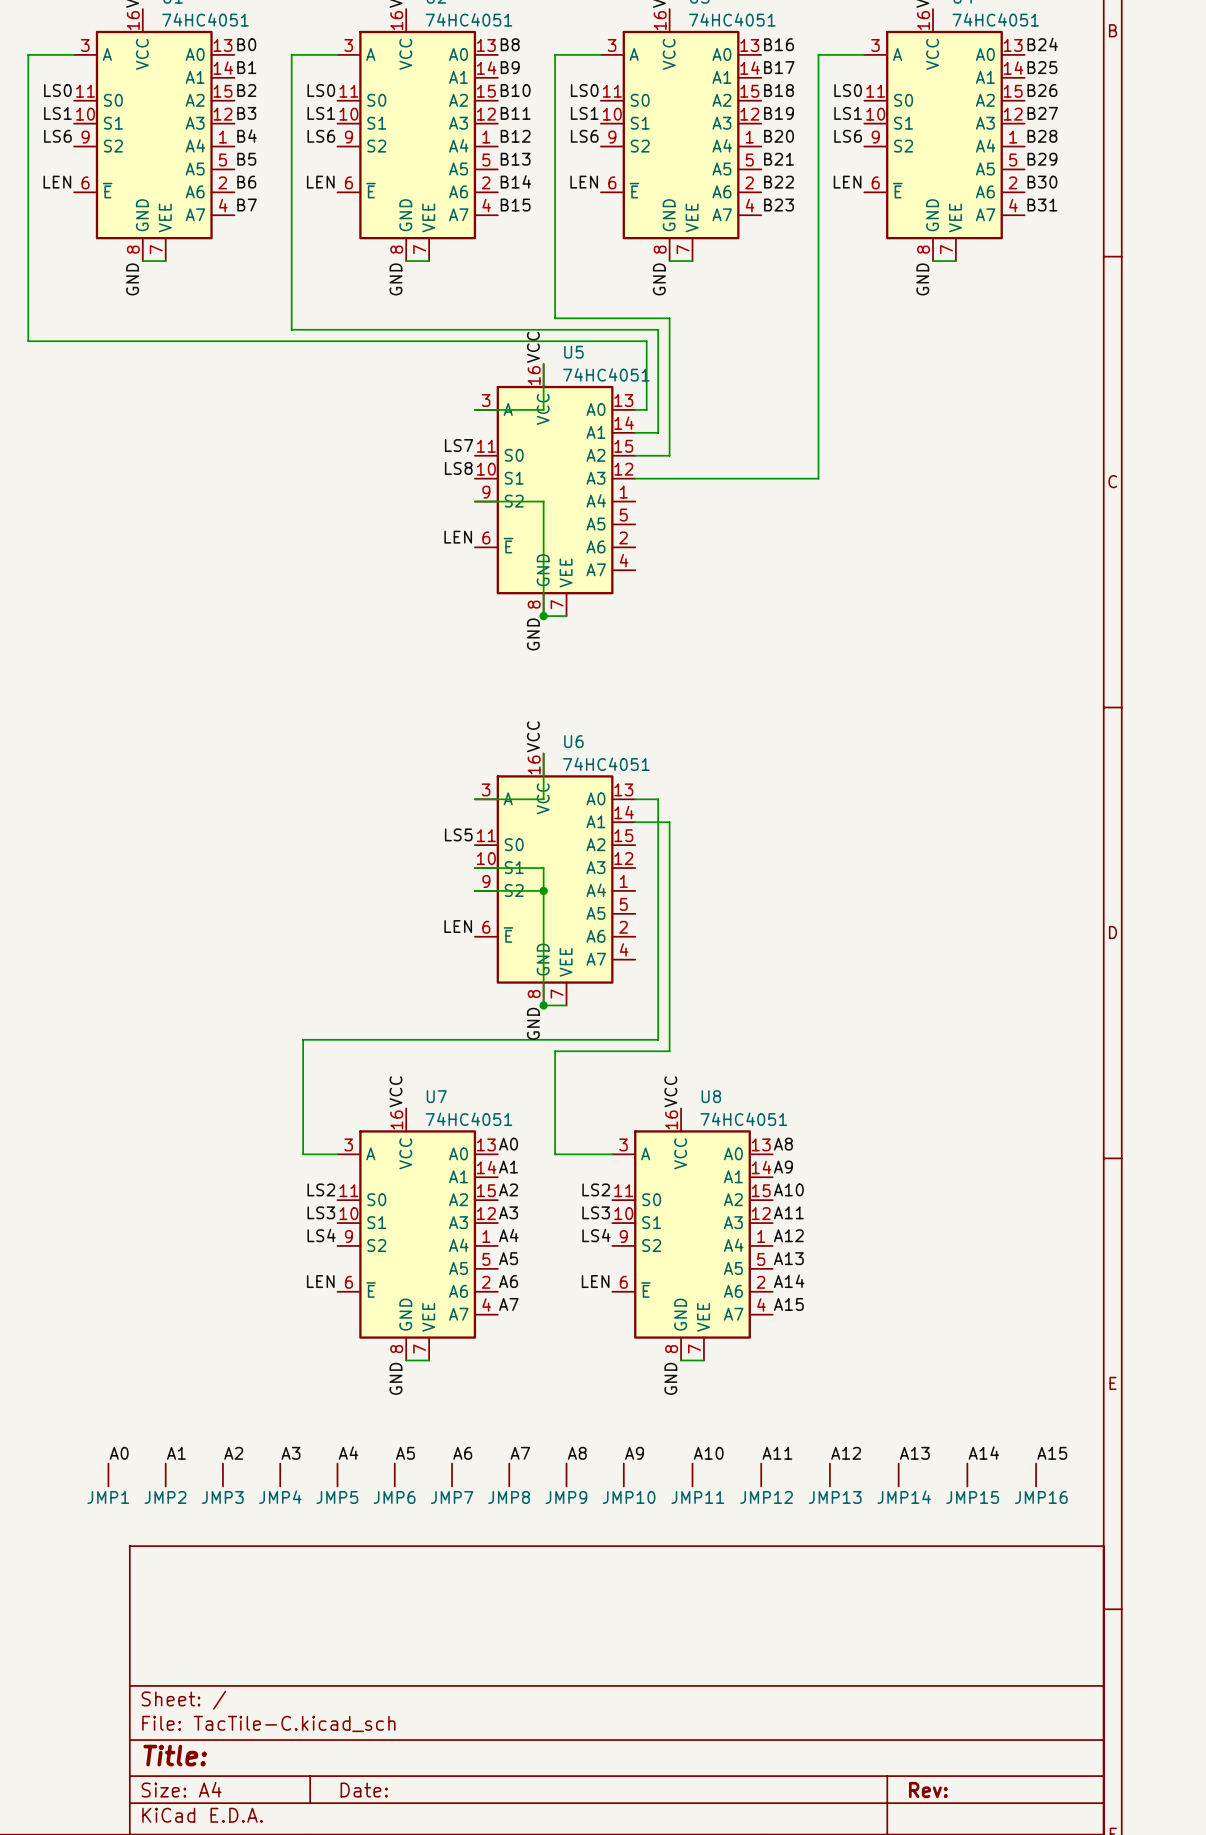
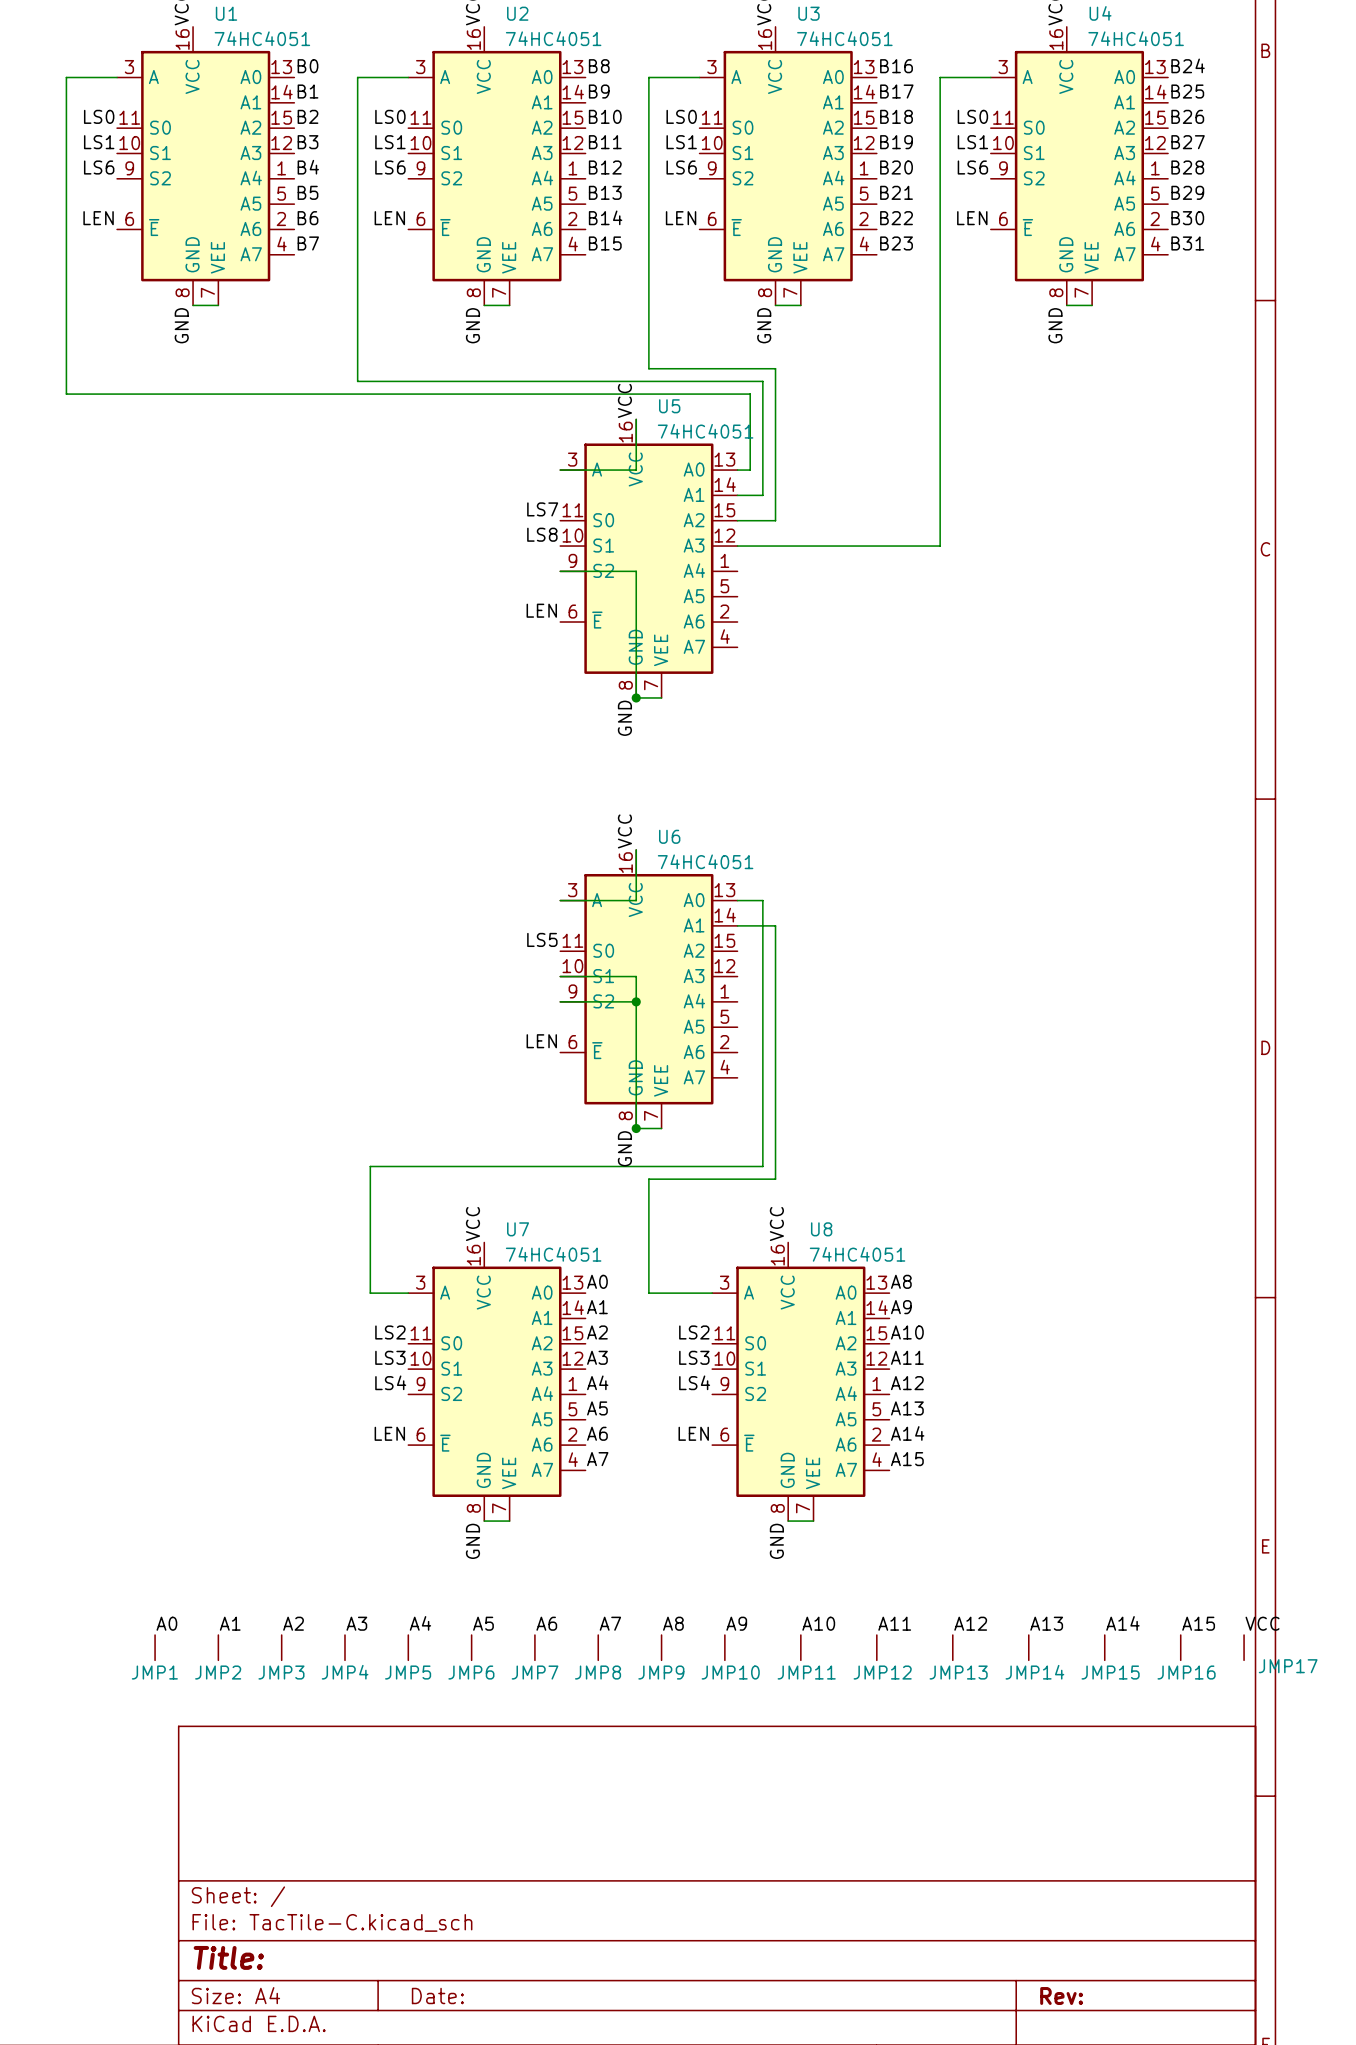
label: none -> VCC (1262, 1623)
JMP17: none -> (1244, 1647)

